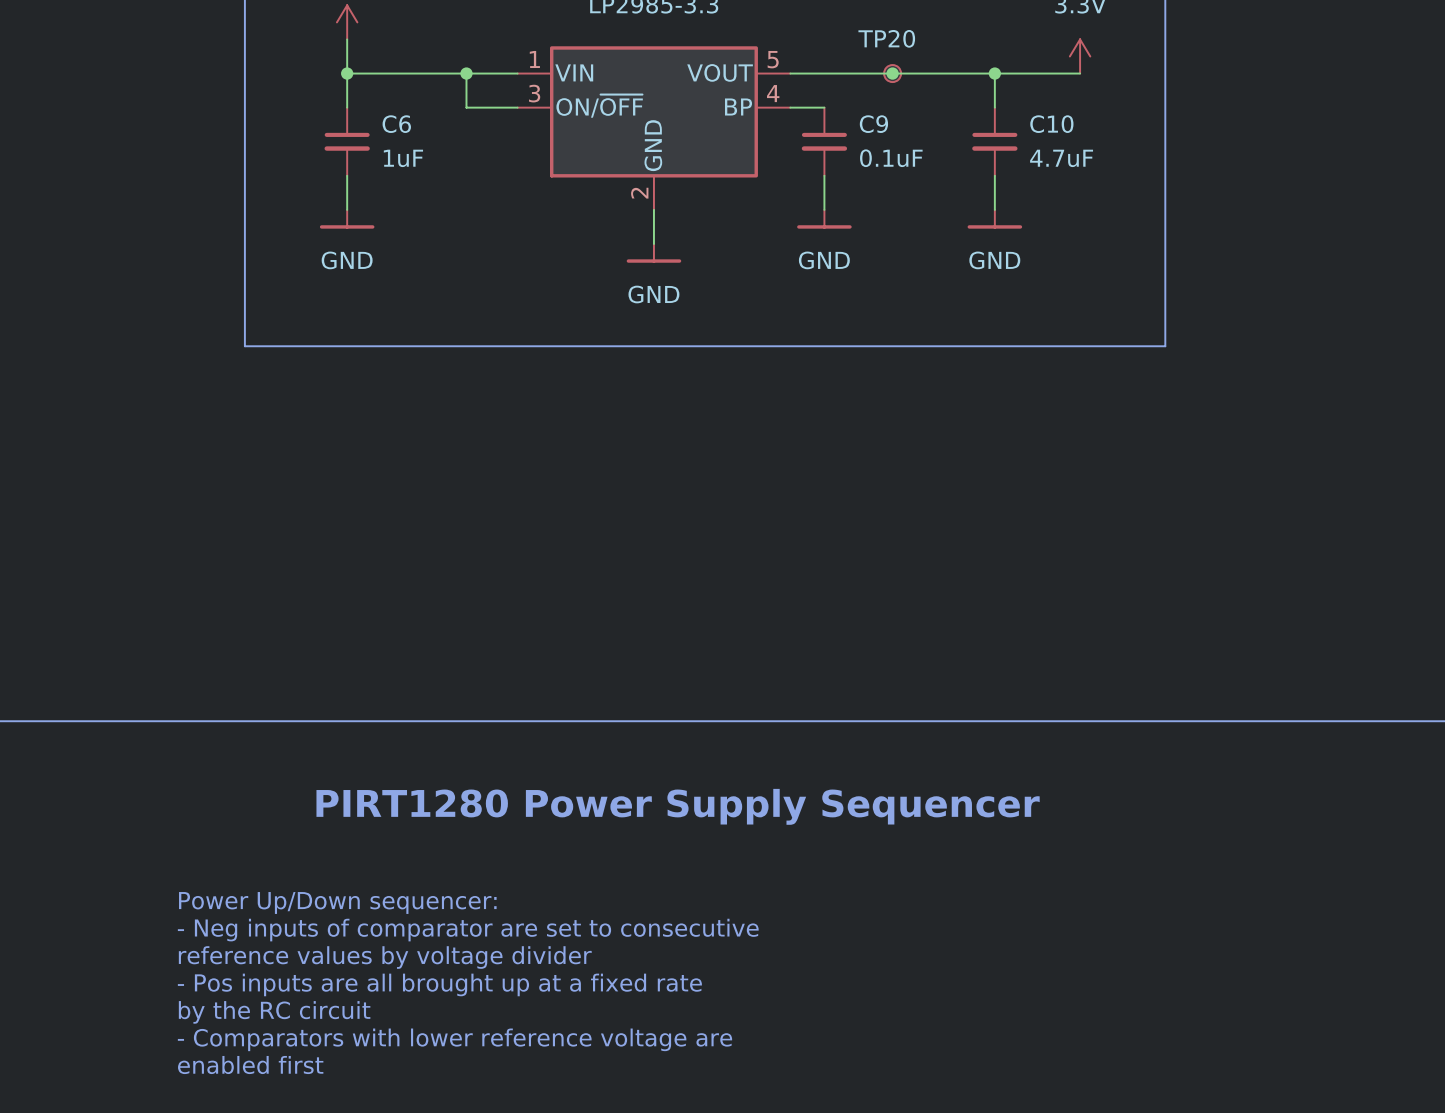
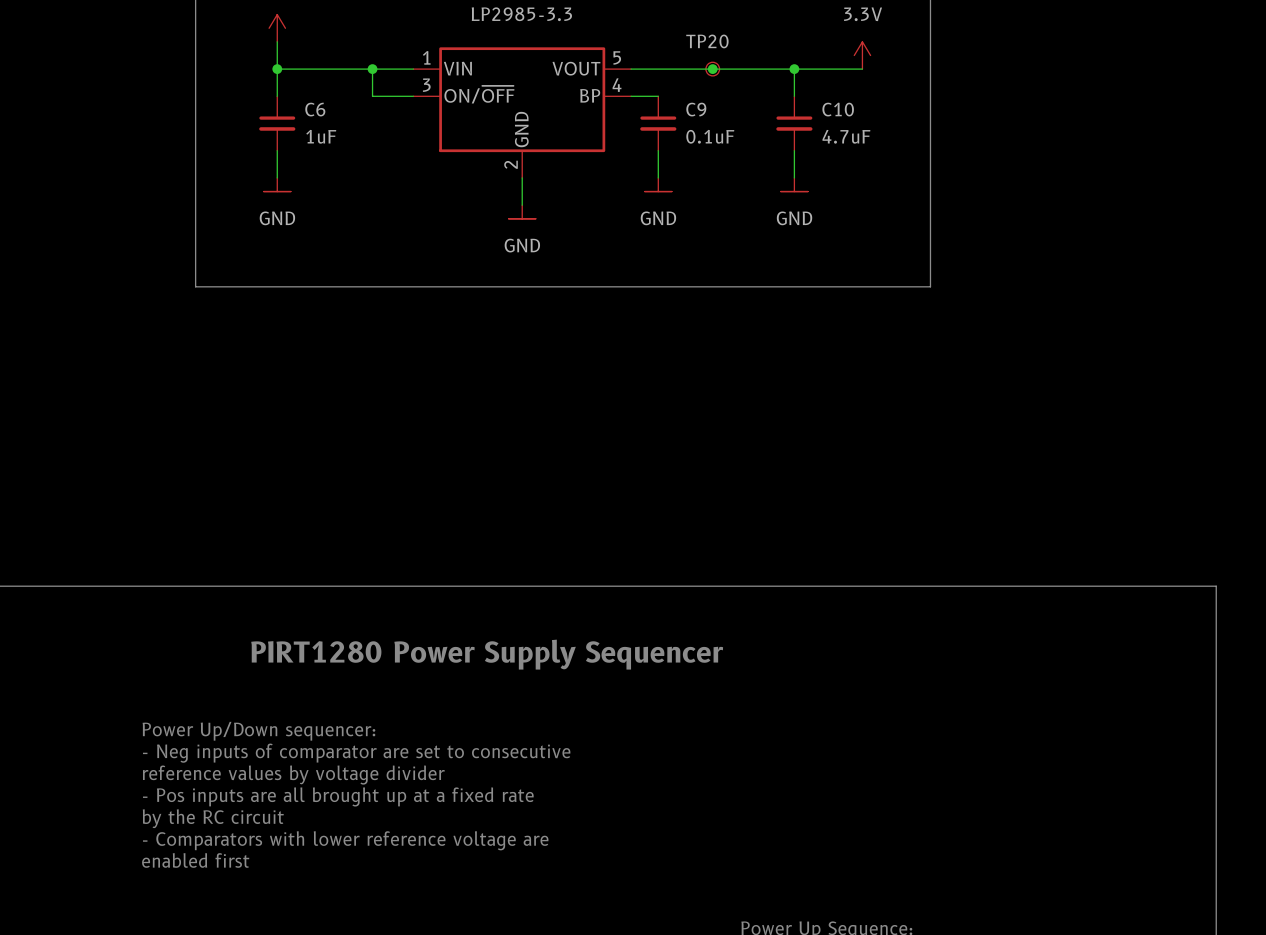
power symbol shape: [319, 209, 375, 229] -> [263, 177, 291, 192]
power symbol shape: [797, 209, 852, 229] -> [644, 177, 672, 192]
power symbol shape: [967, 209, 1023, 229] -> [780, 177, 809, 192]
power symbol shape: [626, 243, 682, 263] -> [508, 205, 536, 219]

